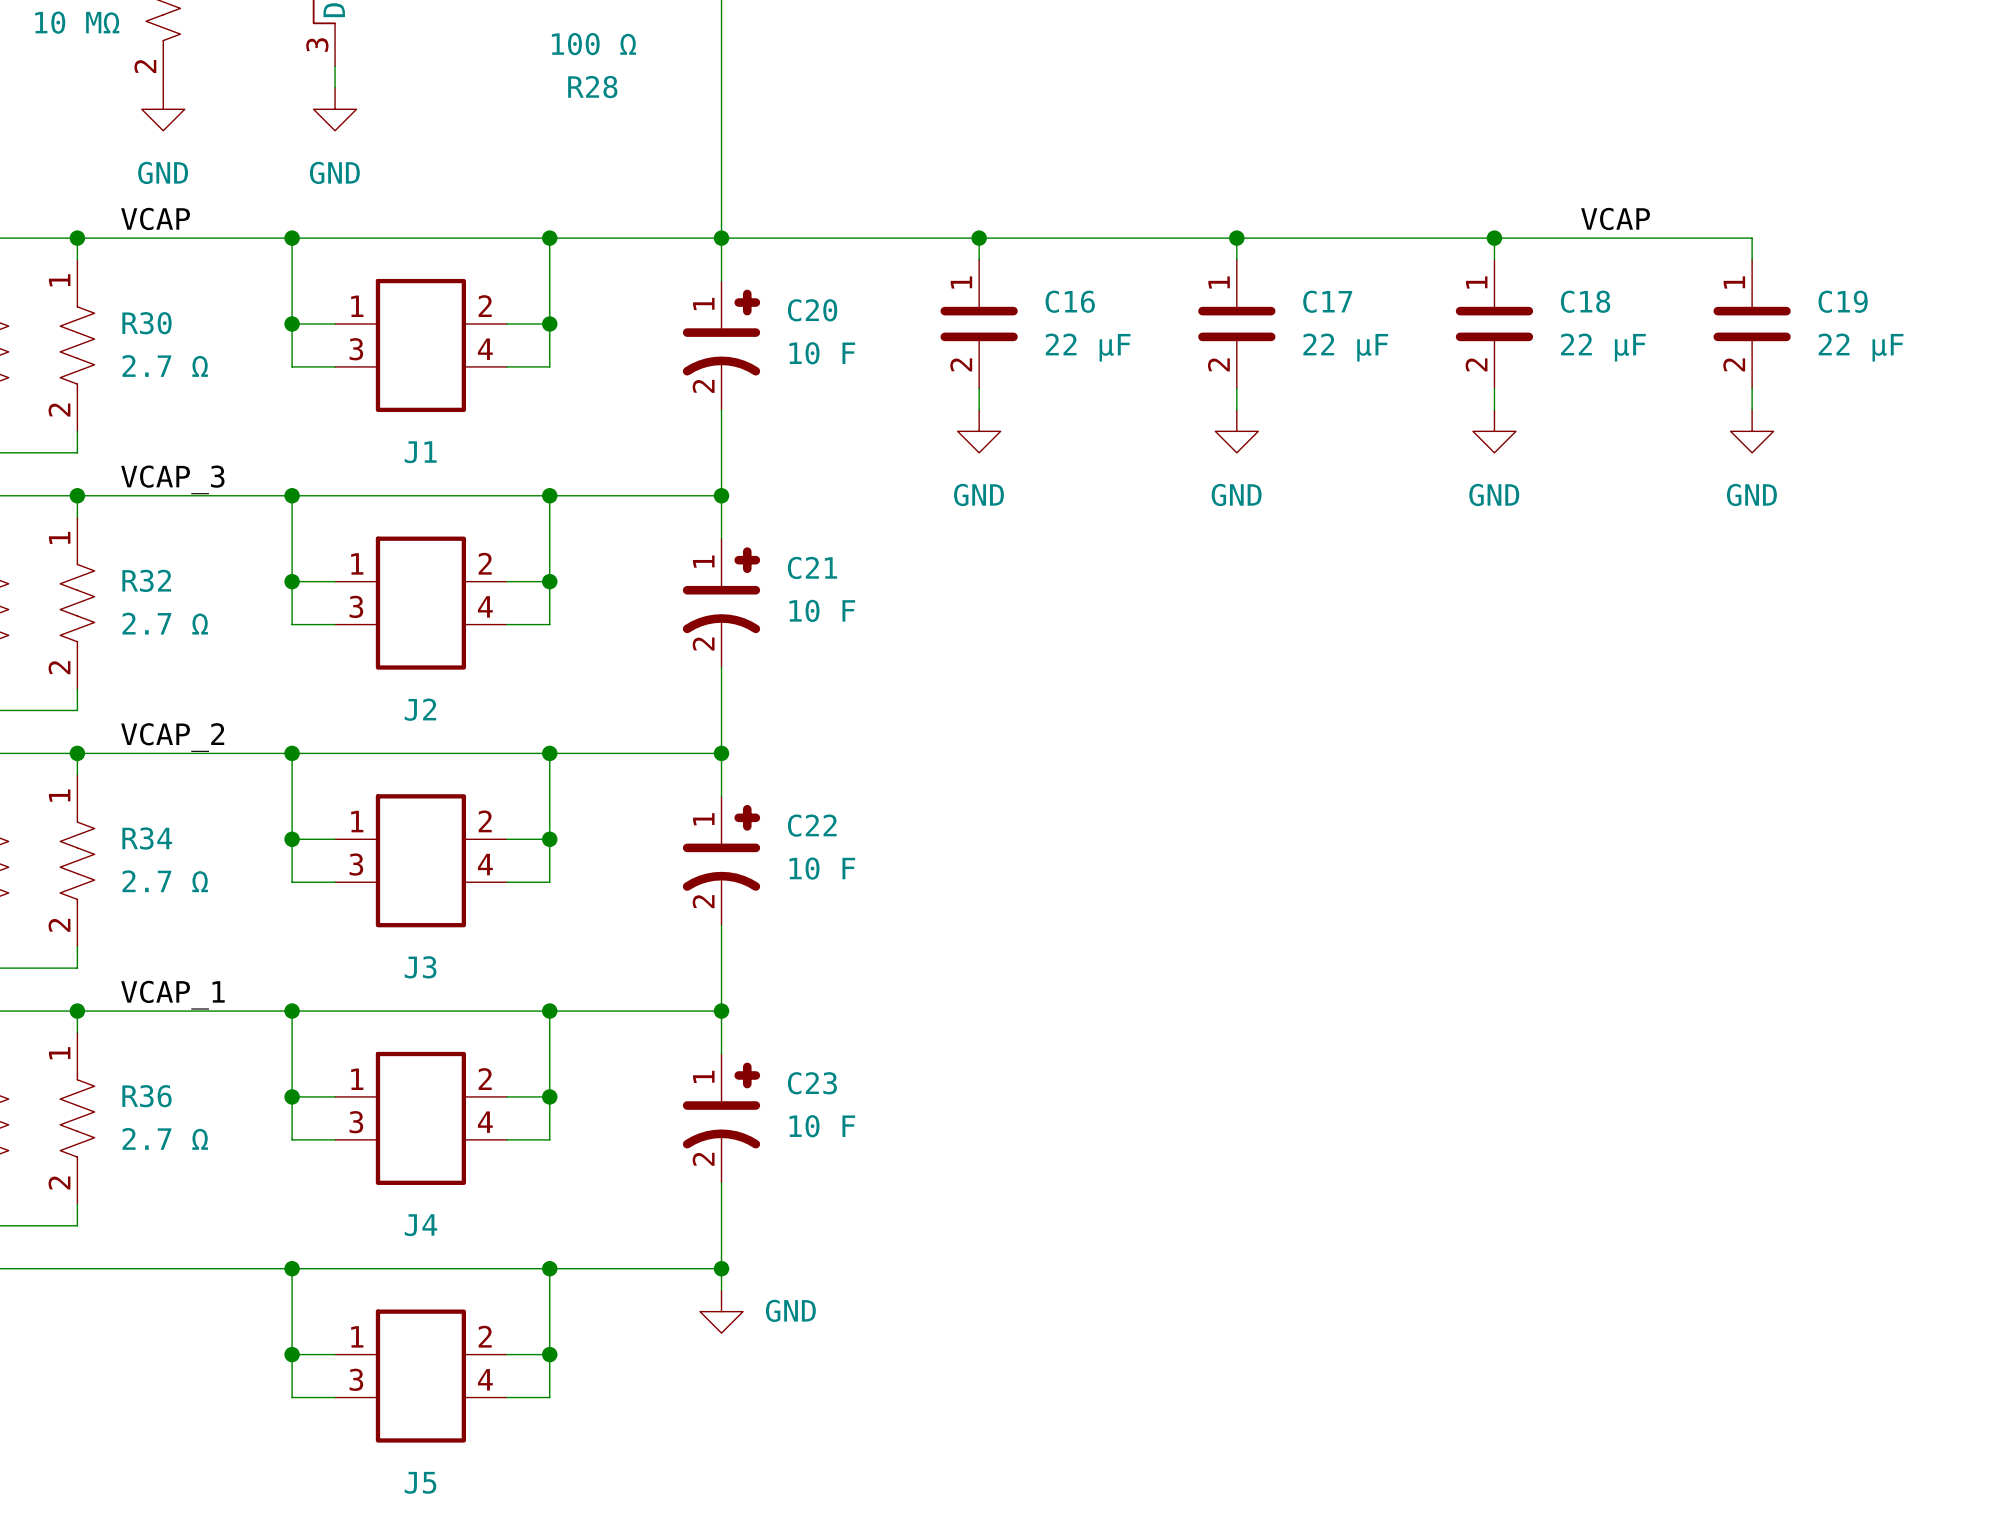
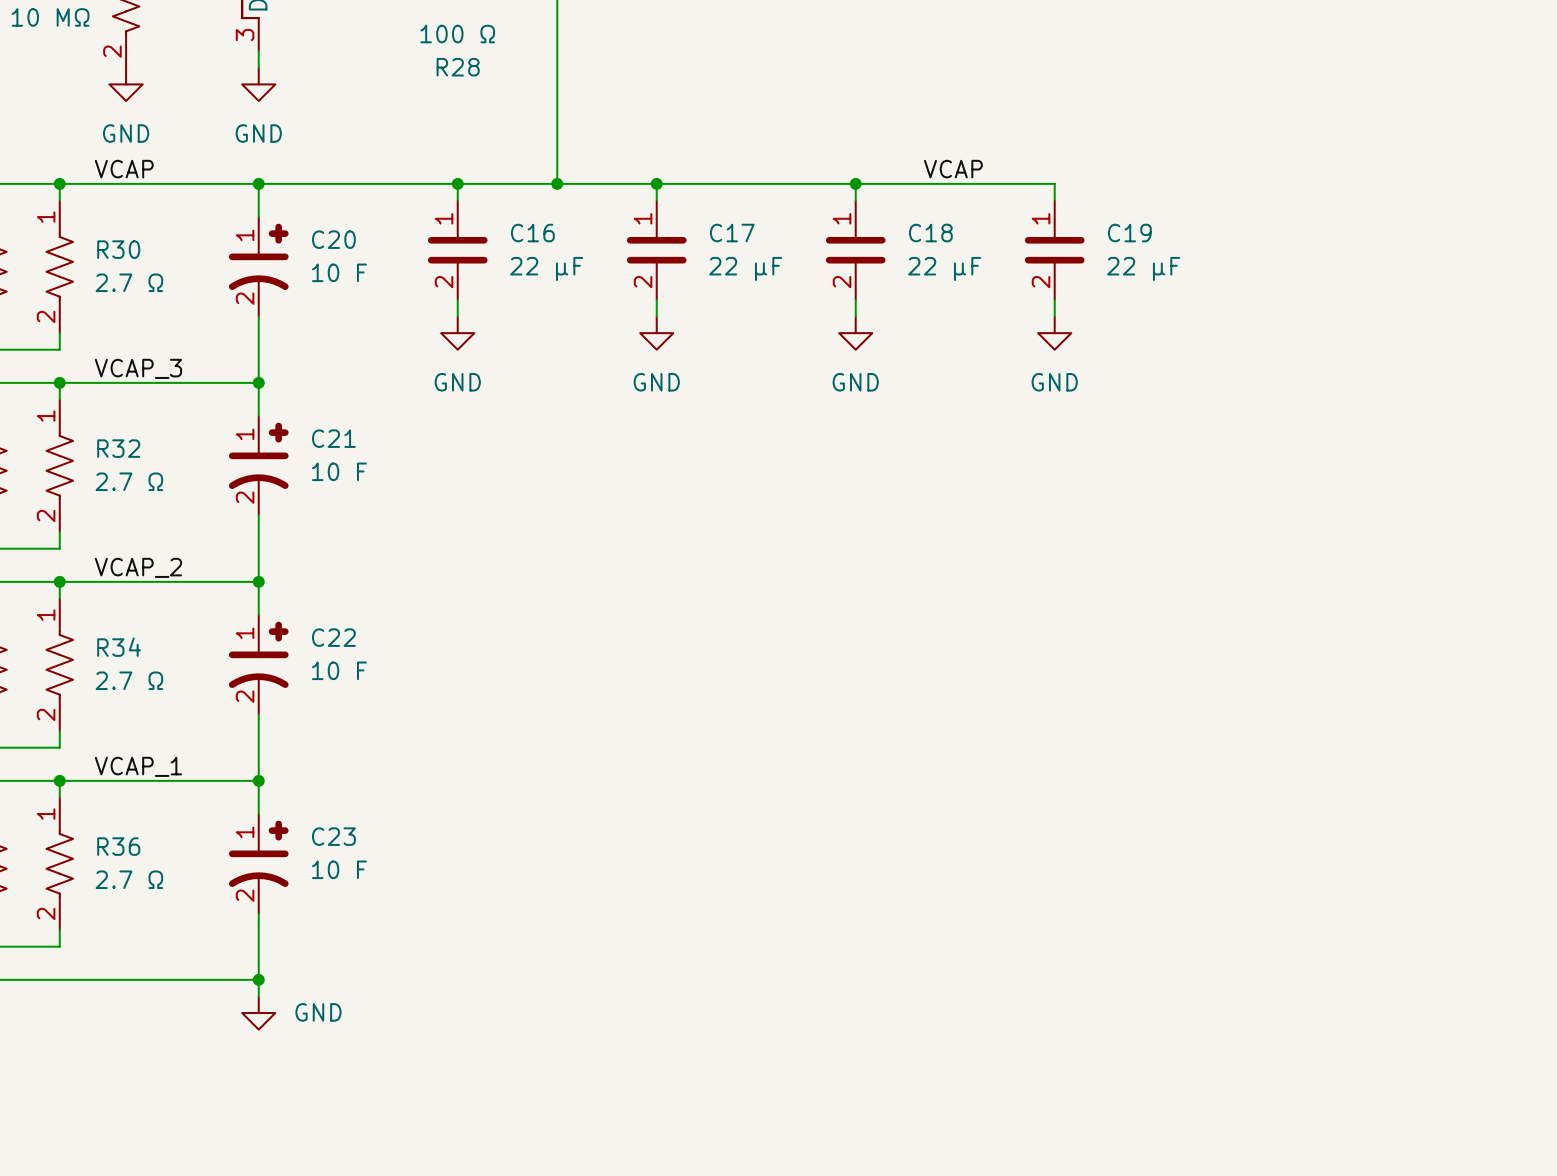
label position: VCAP (1615, 218) -> VCAP (953, 169)
wire: (292, 238) (292, 366) (335, 366) -> none
junction position: (292, 238) -> (258, 183)
wire: (549, 238) (549, 366) (506, 366) -> none
junction position: (549, 238) -> (457, 183)
wire: (721, 238) (721, 281) -> (258, 183) (258, 217)
junction: none -> (656, 183)
wire: (979, 238) (979, 259) -> (457, 183) (457, 200)
junction: (979, 238) -> none
junction: none -> (855, 183)
wire: (1236, 238) (1236, 259) -> (656, 183) (656, 200)
junction: (1236, 238) -> none
wire: (1365, 238) (1752, 238) (1752, 259) -> (1054, 183) (1054, 200)
wire: (1494, 238) (1494, 259) -> (855, 183) (855, 200)
junction: (1494, 238) -> none
wire: (292, 324) (335, 324) -> none
junction: (292, 324) -> none
wire: (506, 324) (549, 324) -> none
junction: (549, 324) -> none
C16 position: (979, 324) -> (457, 250)
C17 position: (1236, 324) -> (656, 250)
C18 position: (1494, 324) -> (855, 250)
C19 position: (1752, 324) -> (1054, 250)
J1: (420, 345) -> none
C20 position: (721, 345) -> (258, 266)
wire: (979, 388) (979, 409) -> (457, 299) (457, 316)
wire: (1236, 388) (1236, 409) -> (656, 299) (656, 316)
wire: (1494, 388) (1494, 409) -> (855, 299) (855, 316)
wire: (1752, 388) (1752, 409) -> (1054, 299) (1054, 316)
wire: (721, 409) (721, 538) -> (258, 316) (258, 416)
power symbol: none -> GND (457, 333)
power symbol: none -> GND (656, 333)
power symbol: GND (979, 431) -> none
power symbol: none -> GND (855, 333)
power symbol: GND (1236, 431) -> none
power symbol: none -> GND (1054, 333)
power symbol: GND (1494, 431) -> none
power symbol: GND (1752, 431) -> none
wire: (292, 495) (292, 624) (335, 624) -> none
junction position: (292, 495) -> (258, 382)
wire: (335, 495) (721, 495) -> none
wire: (549, 495) (549, 624) (506, 624) -> none
junction: (549, 495) -> none
junction: (721, 495) -> none
wire: (292, 581) (335, 581) -> none
junction: (292, 581) -> none
wire: (506, 581) (549, 581) -> none
junction: (549, 581) -> none
J2: (420, 603) -> none
C21 position: (721, 603) -> (258, 465)
wire: (721, 667) (721, 796) -> (258, 515) (258, 615)
wire: (292, 753) (292, 882) (335, 882) -> none
junction position: (292, 753) -> (258, 581)
wire: (335, 753) (721, 753) -> none
wire: (549, 753) (549, 882) (506, 882) -> none
junction: (549, 753) -> none
junction: (721, 753) -> none
wire: (292, 839) (335, 839) -> none
junction: (292, 839) -> none
wire: (506, 839) (549, 839) -> none
junction: (549, 839) -> none
J3: (420, 860) -> none
C22 position: (721, 860) -> (258, 664)
wire: (721, 925) (721, 1054) -> (258, 714) (258, 814)
wire: (292, 1011) (292, 1139) (335, 1139) -> none
junction position: (292, 1011) -> (258, 780)
wire: (335, 1011) (721, 1011) -> none
wire: (549, 1011) (549, 1139) (506, 1139) -> none
junction: (549, 1011) -> none
junction: (721, 1011) -> none
wire: (292, 1096) (335, 1096) -> none
junction: (292, 1096) -> none
wire: (506, 1096) (549, 1096) -> none
junction: (549, 1096) -> none
J4: (420, 1118) -> none
C23 position: (721, 1118) -> (258, 863)
wire: (721, 1182) (721, 1290) -> (258, 913) (258, 996)
wire: (292, 1268) (292, 1397) (335, 1397) -> none
junction position: (292, 1268) -> (258, 979)
wire: (335, 1268) (721, 1268) -> none
wire: (549, 1268) (549, 1397) (506, 1397) -> none
junction: (549, 1268) -> none
junction: (721, 1268) -> none
power symbol position: GND (721, 1311) -> GND (258, 1013)
wire: (292, 1354) (335, 1354) -> none
junction: (292, 1354) -> none
wire: (506, 1354) (549, 1354) -> none
junction: (549, 1354) -> none
J5: (420, 1376) -> none

